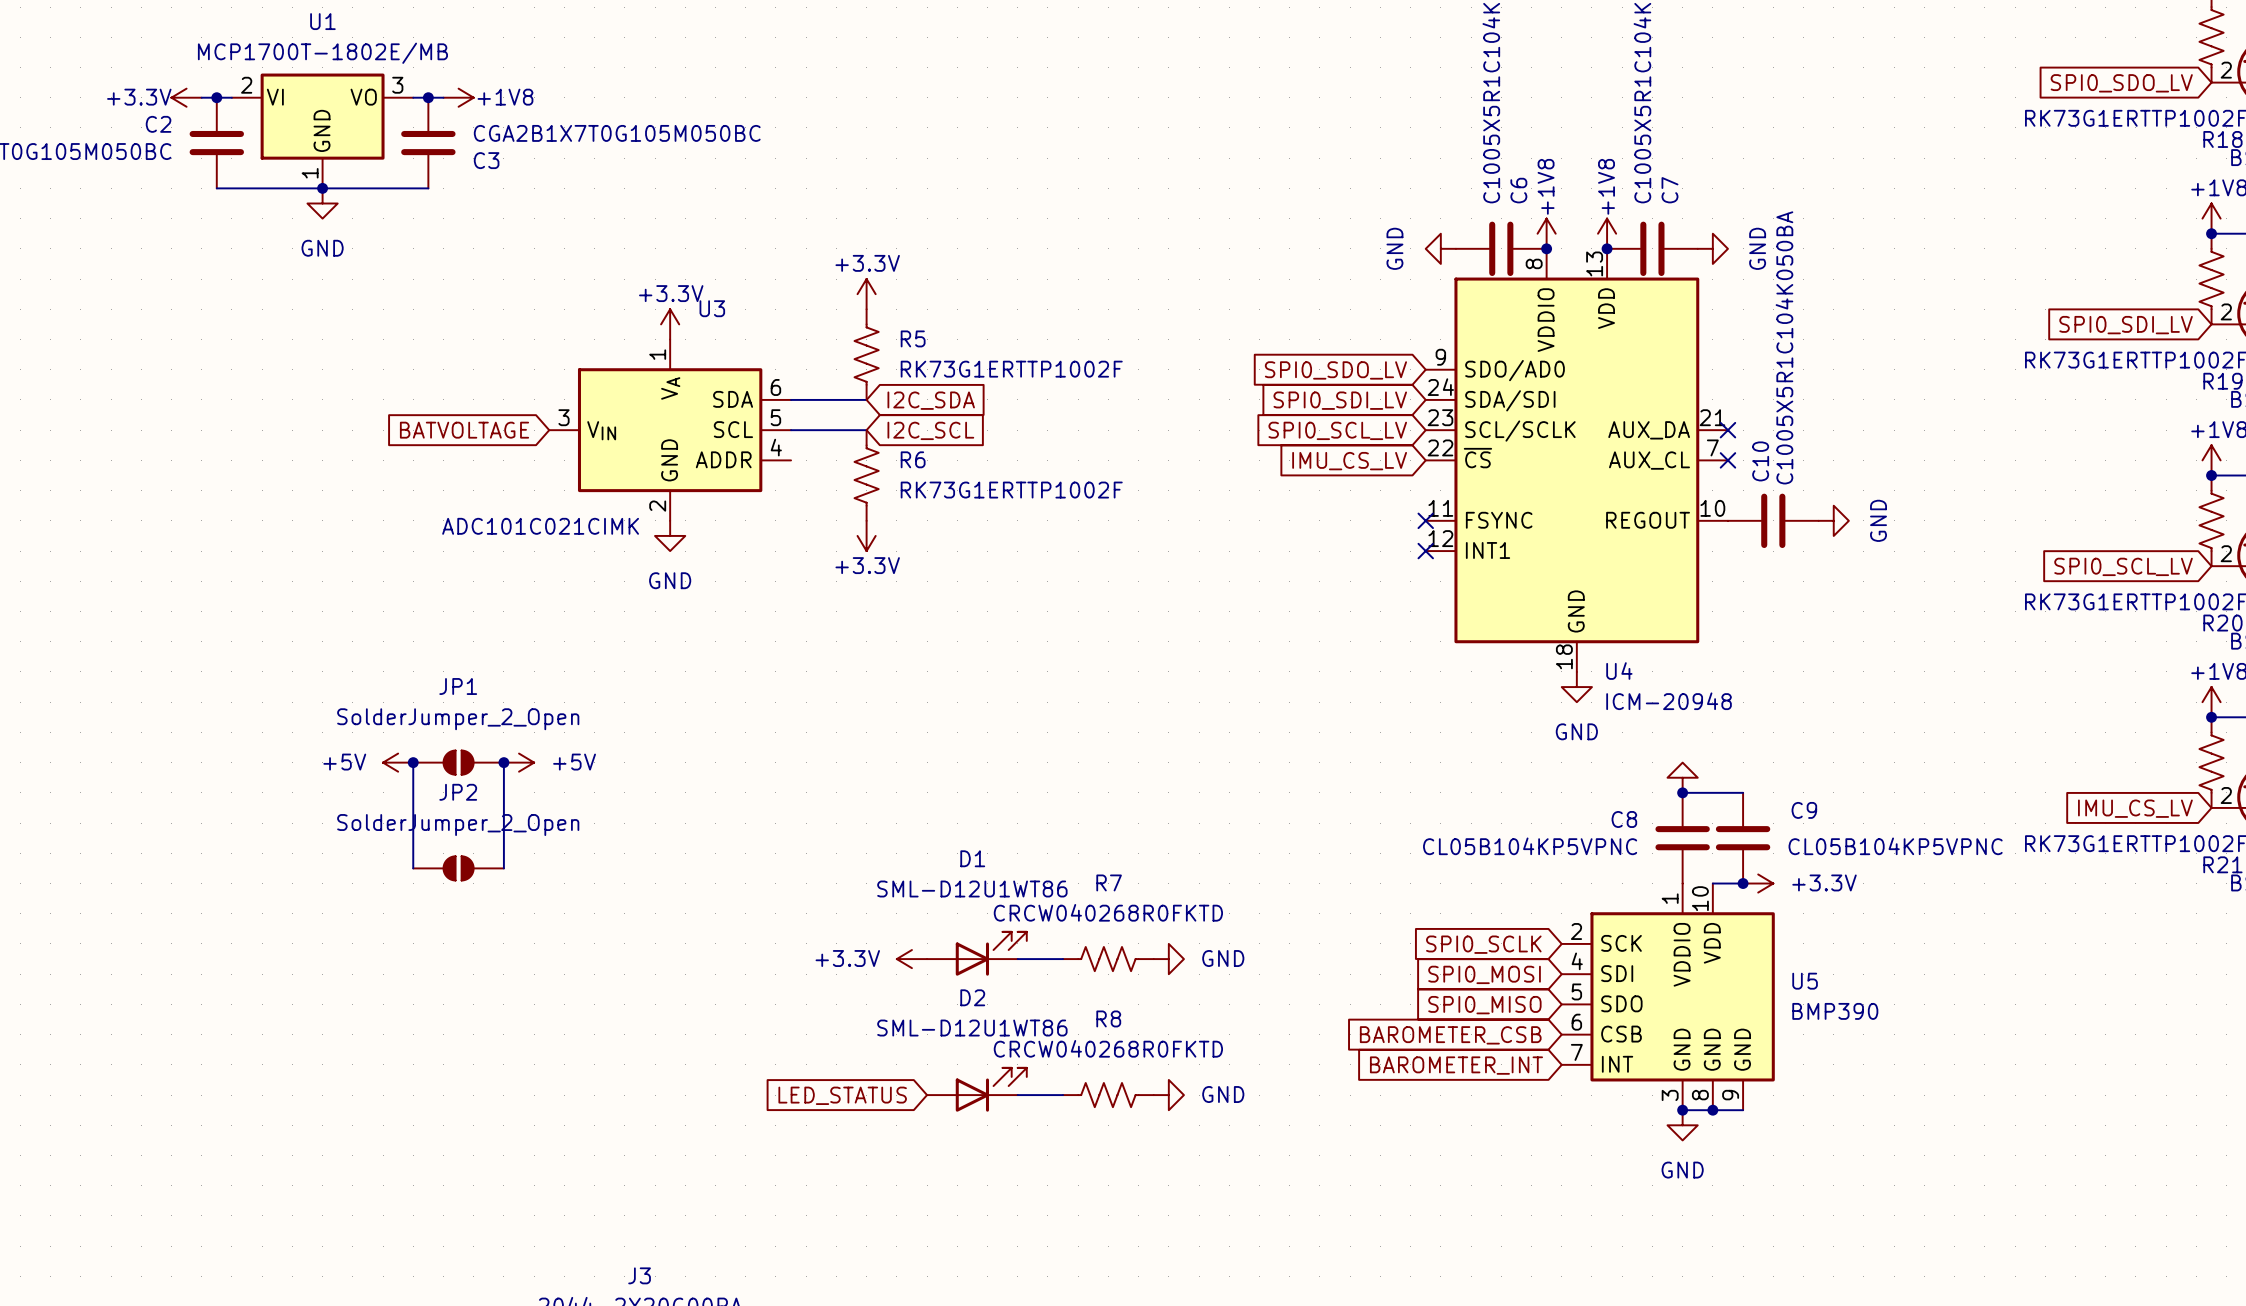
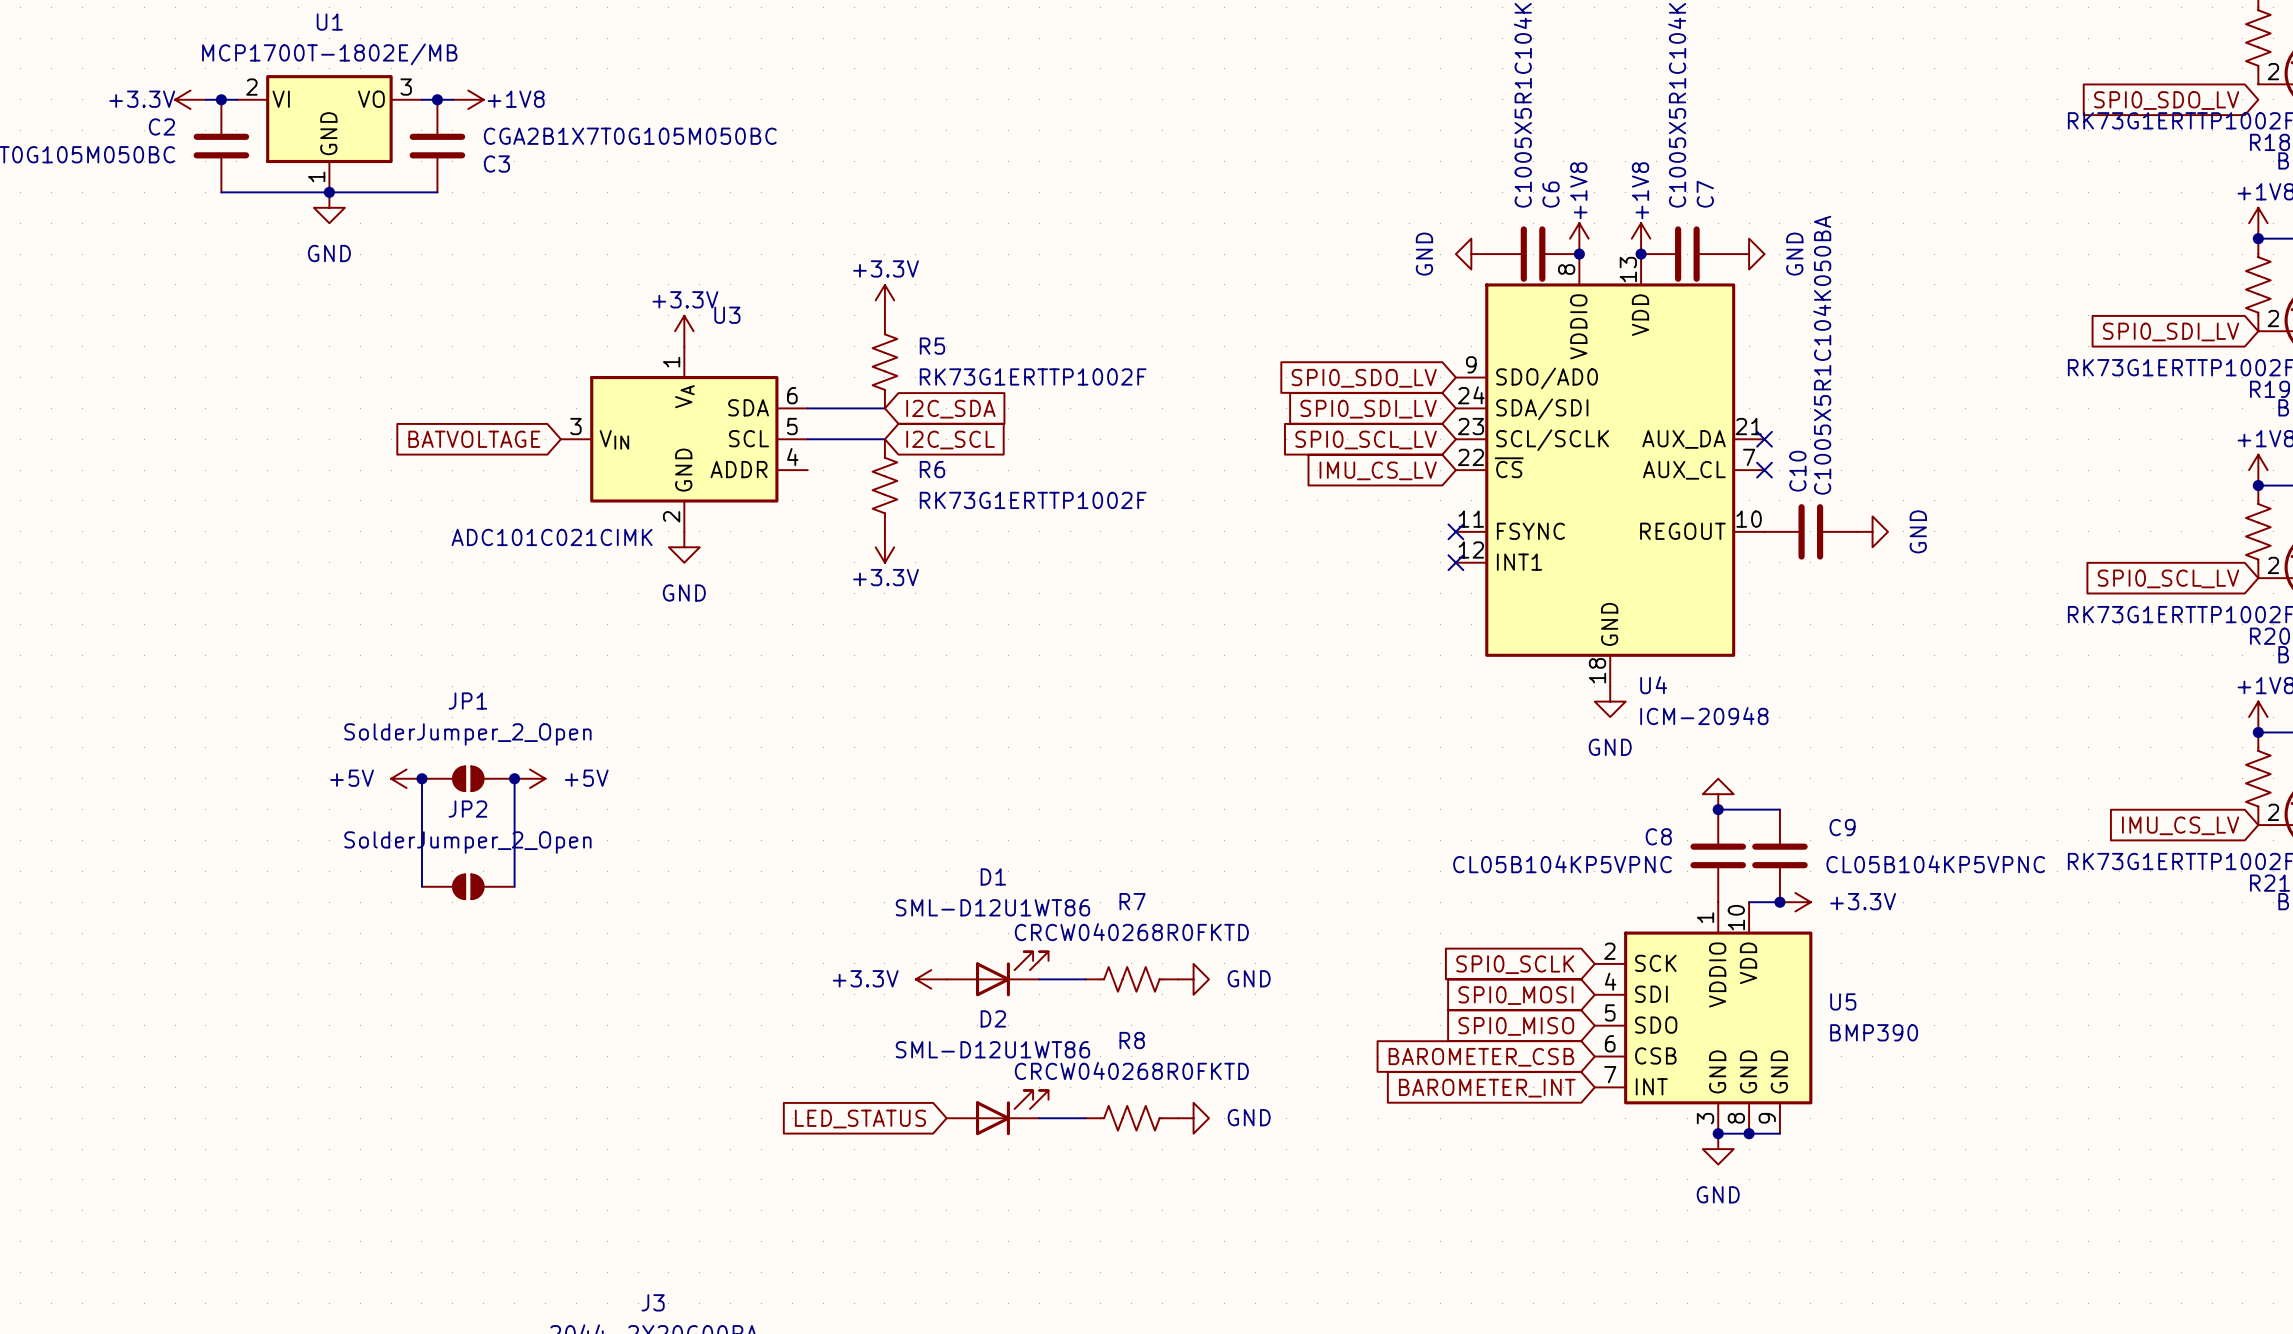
global label position: SPI0_SDO_LV (2121, 83) -> SPI0_SDO_LV (2166, 100)

